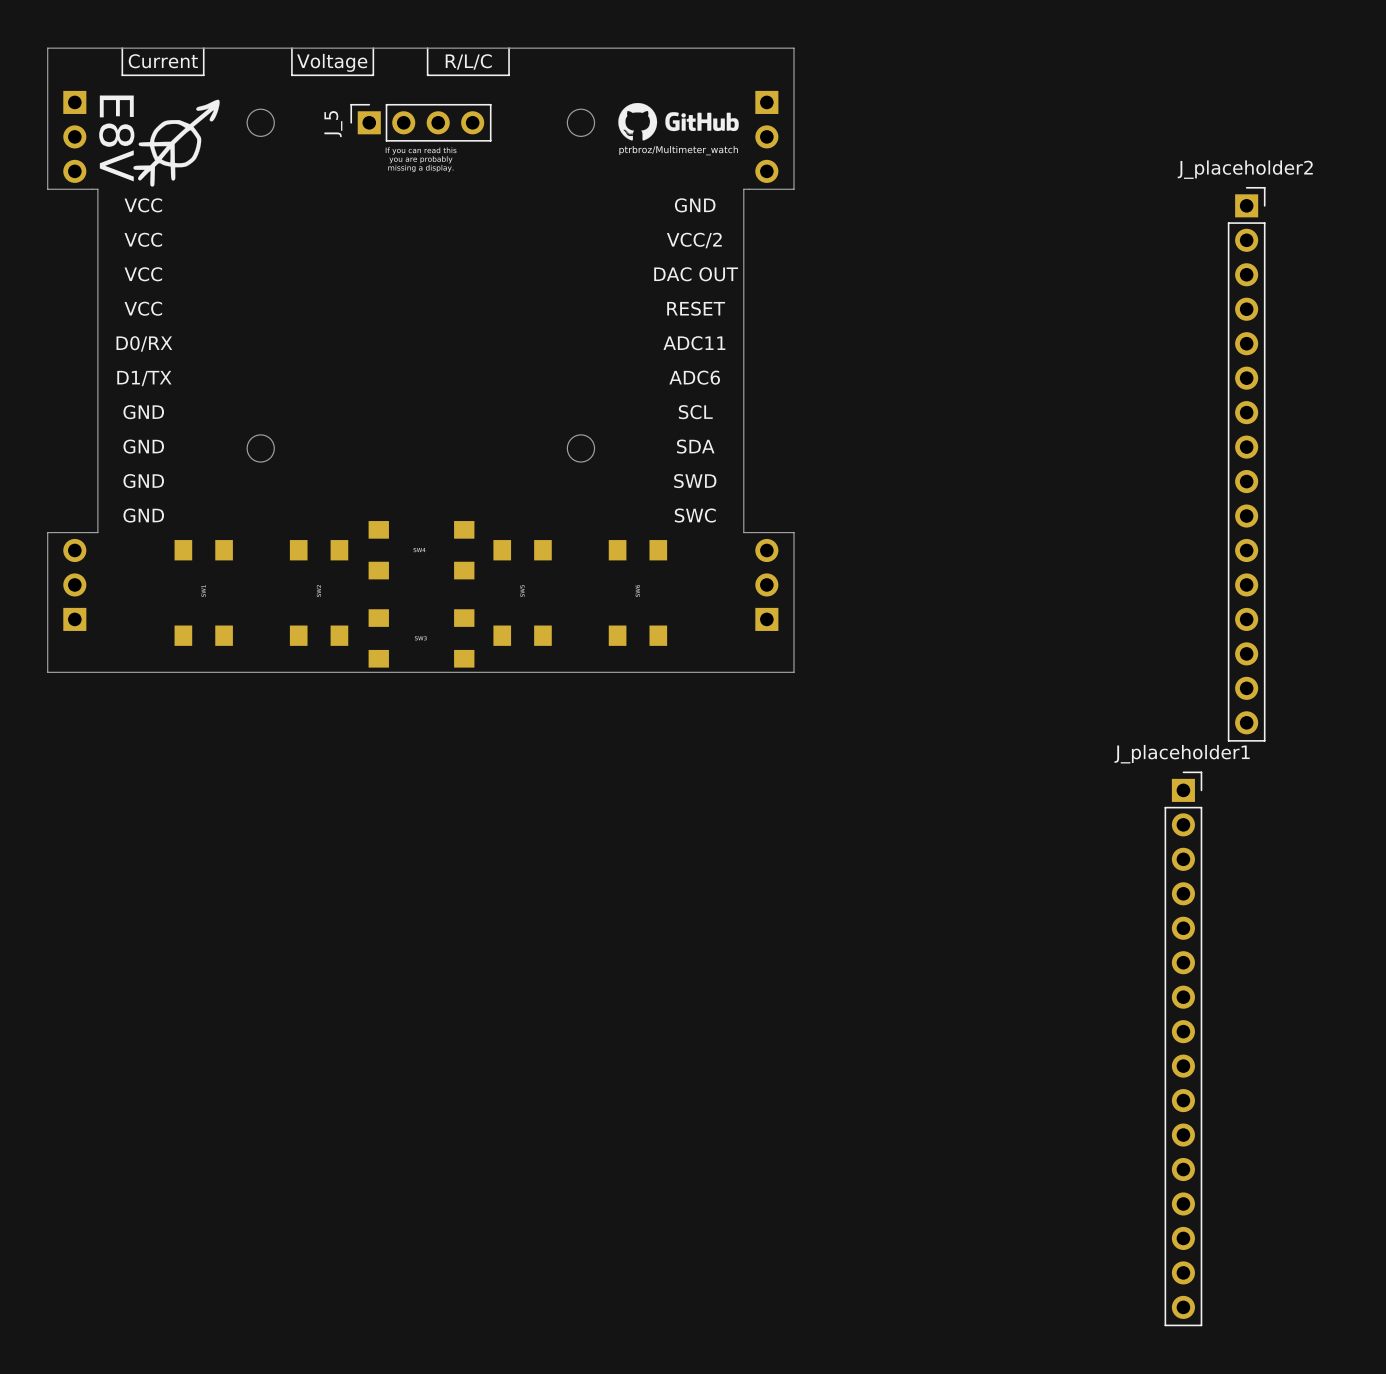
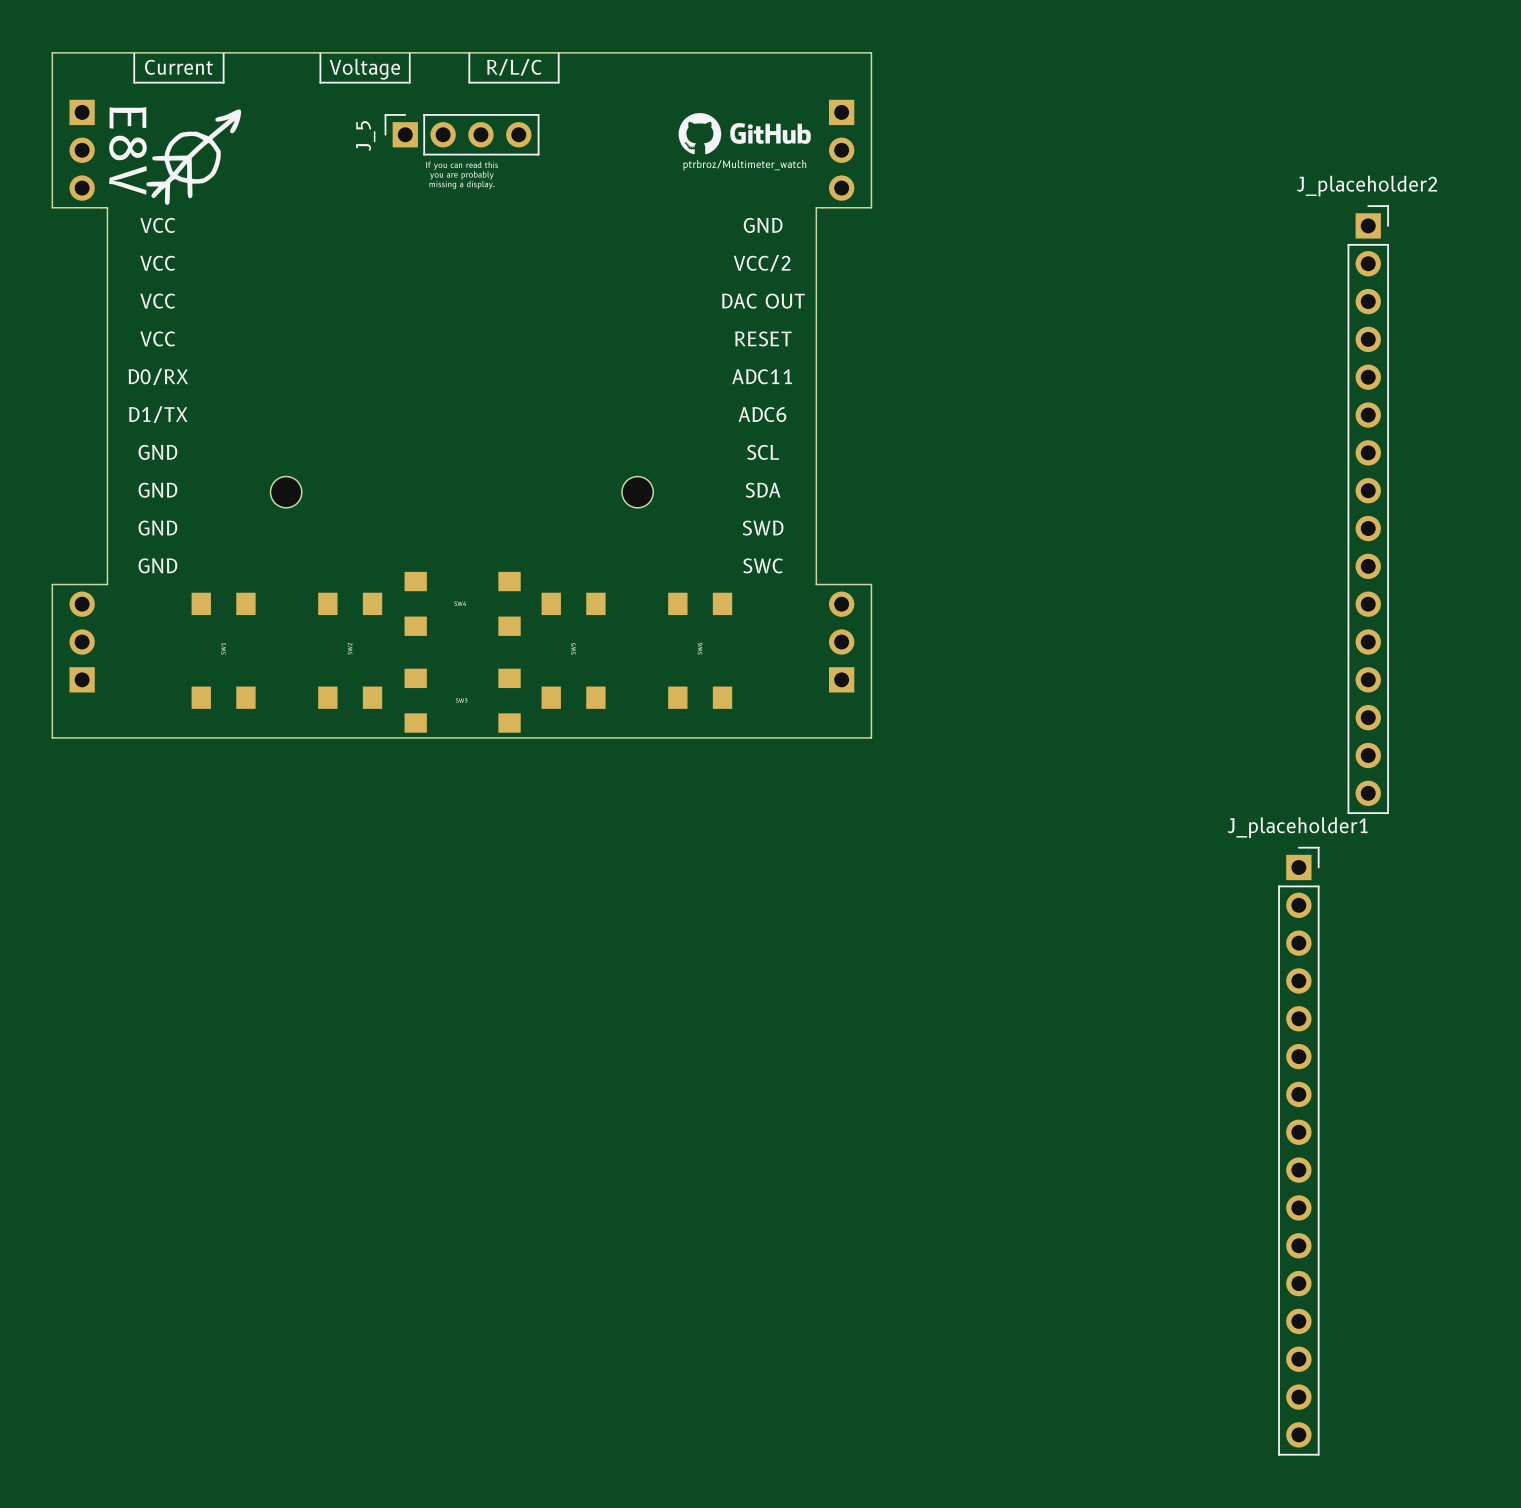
round board edge: [246, 108, 275, 137] -> none
round board edge: [567, 108, 595, 137] -> none
round board edge: [246, 434, 275, 463] -> none
round board edge: [567, 434, 595, 463] -> none
part: none -> (286, 492)
part: none -> (637, 492)

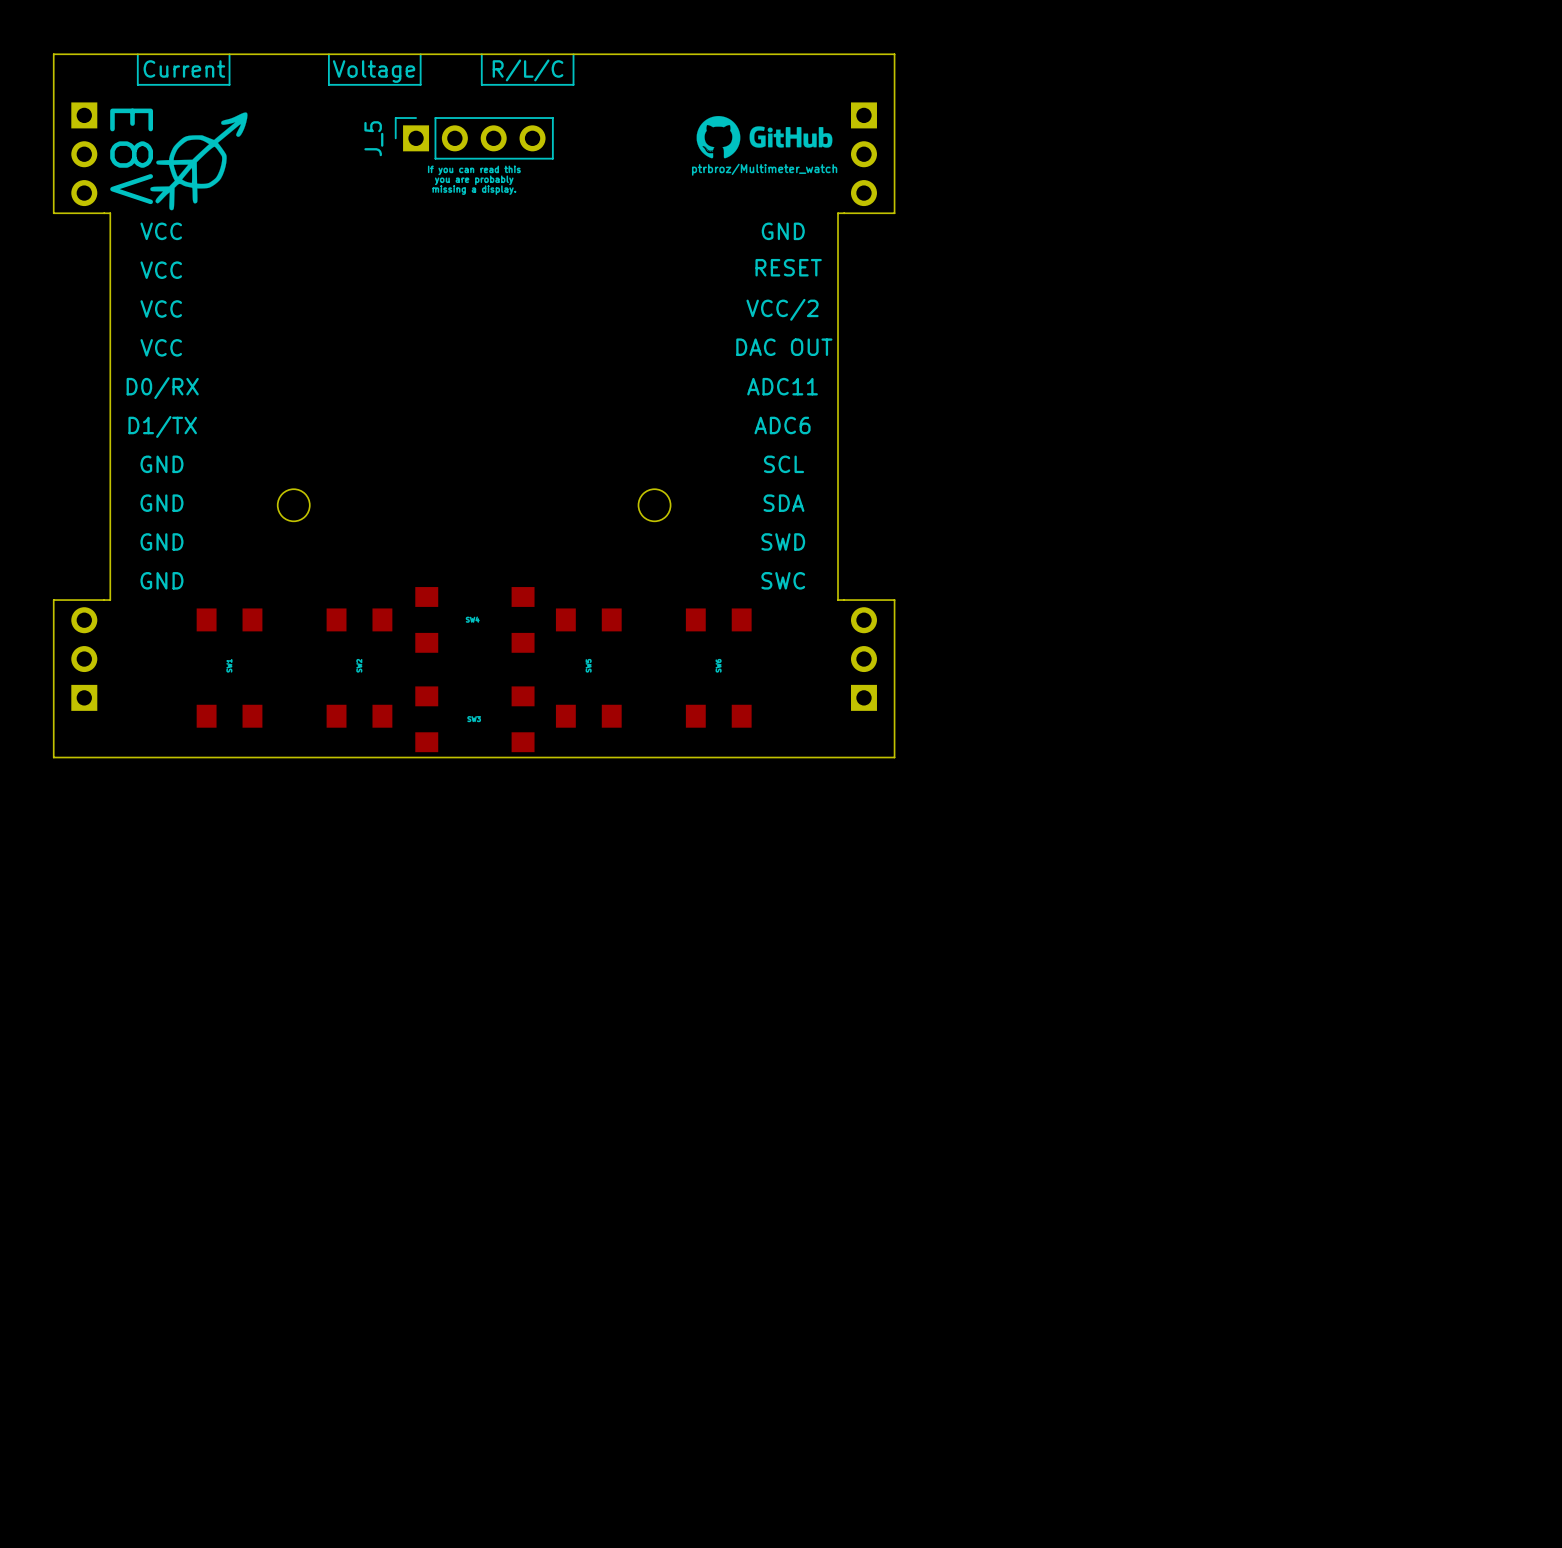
text: VCC/2 (762, 263) -> RESET (788, 267)
text: DAC OUT (763, 301) -> VCC/2 (782, 309)
text: RESET (763, 338) -> DAC OUT (784, 347)
J_placeholder2: (1368, 509) -> none
J_placeholder1: (1298, 1151) -> none

